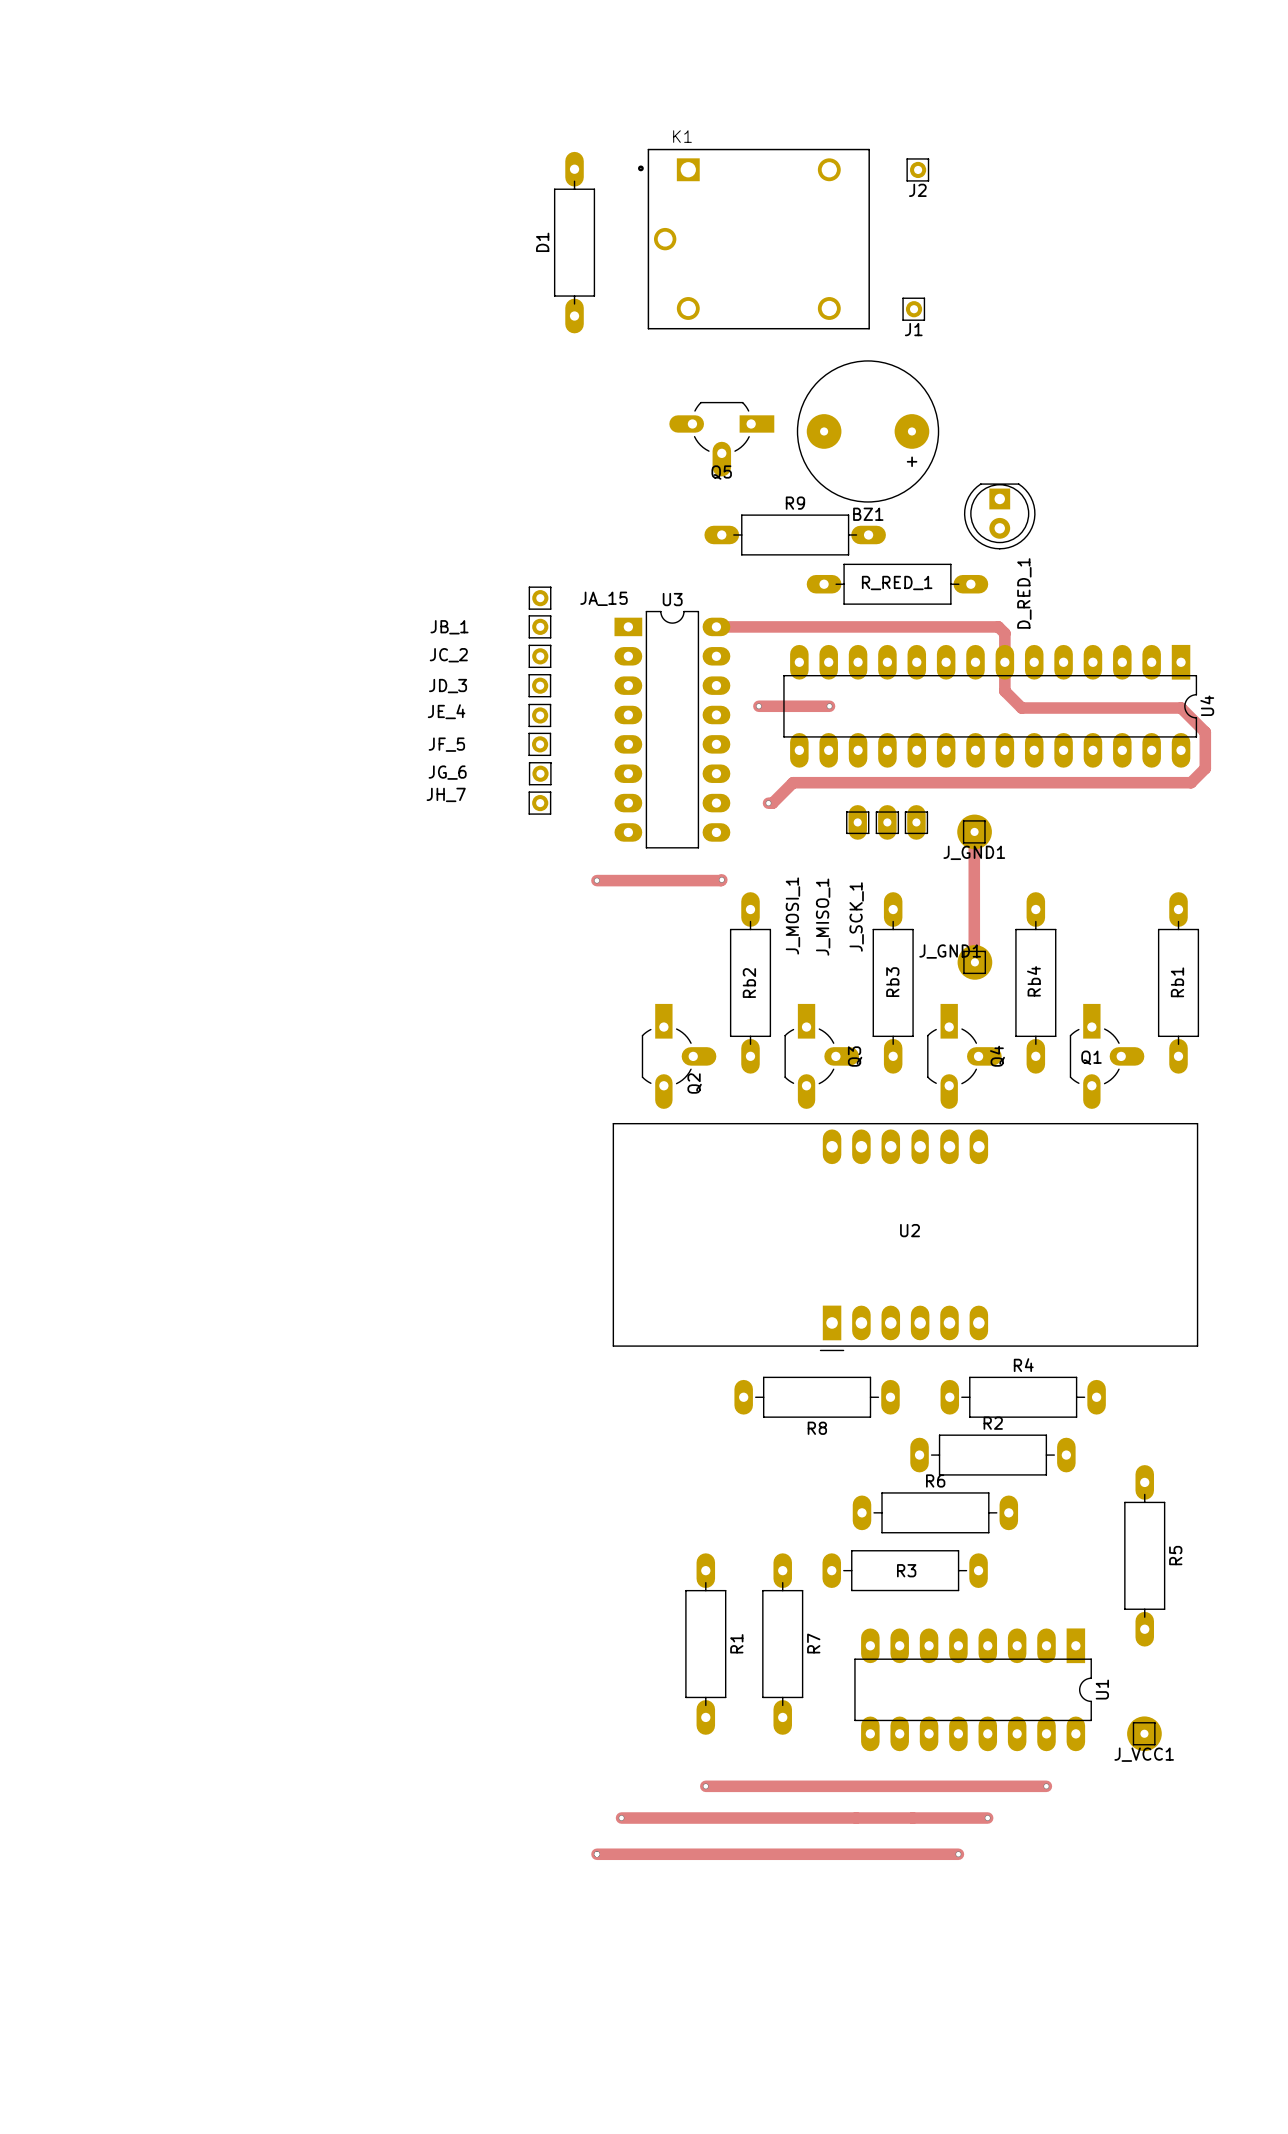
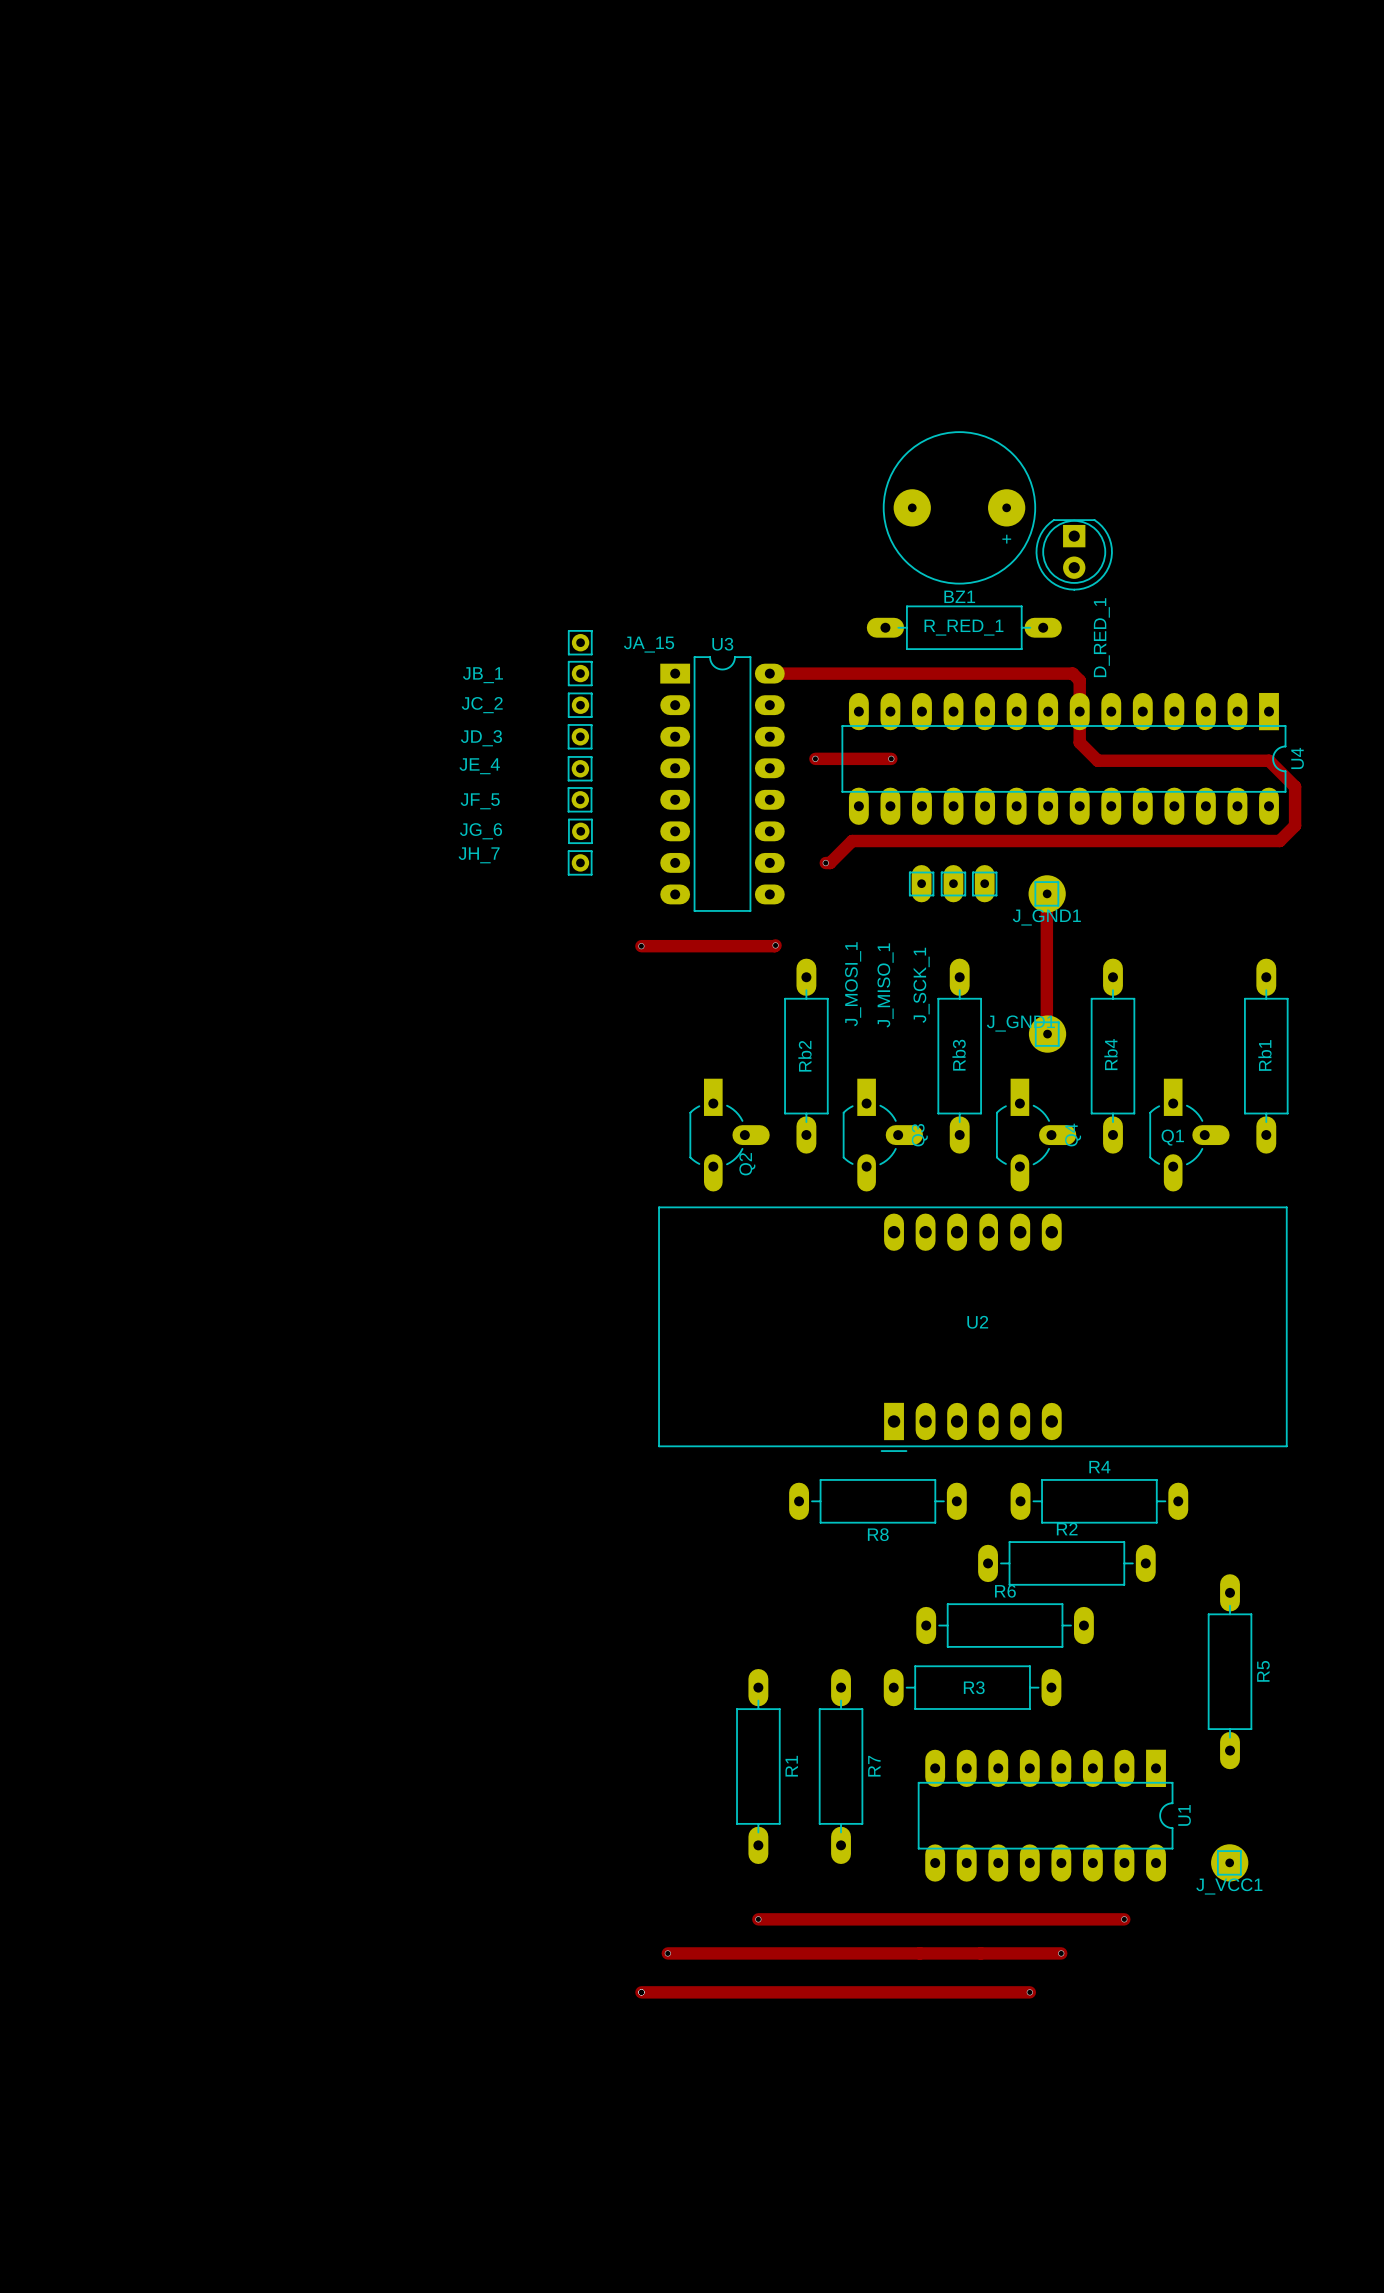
J2: (917, 169) -> none
K1: (753, 239) -> none
D1: (574, 242) -> none
J1: (913, 309) -> none
BZ1 position: (868, 431) -> (959, 507)
Q5: (721, 439) -> none
R9: (795, 534) -> none

